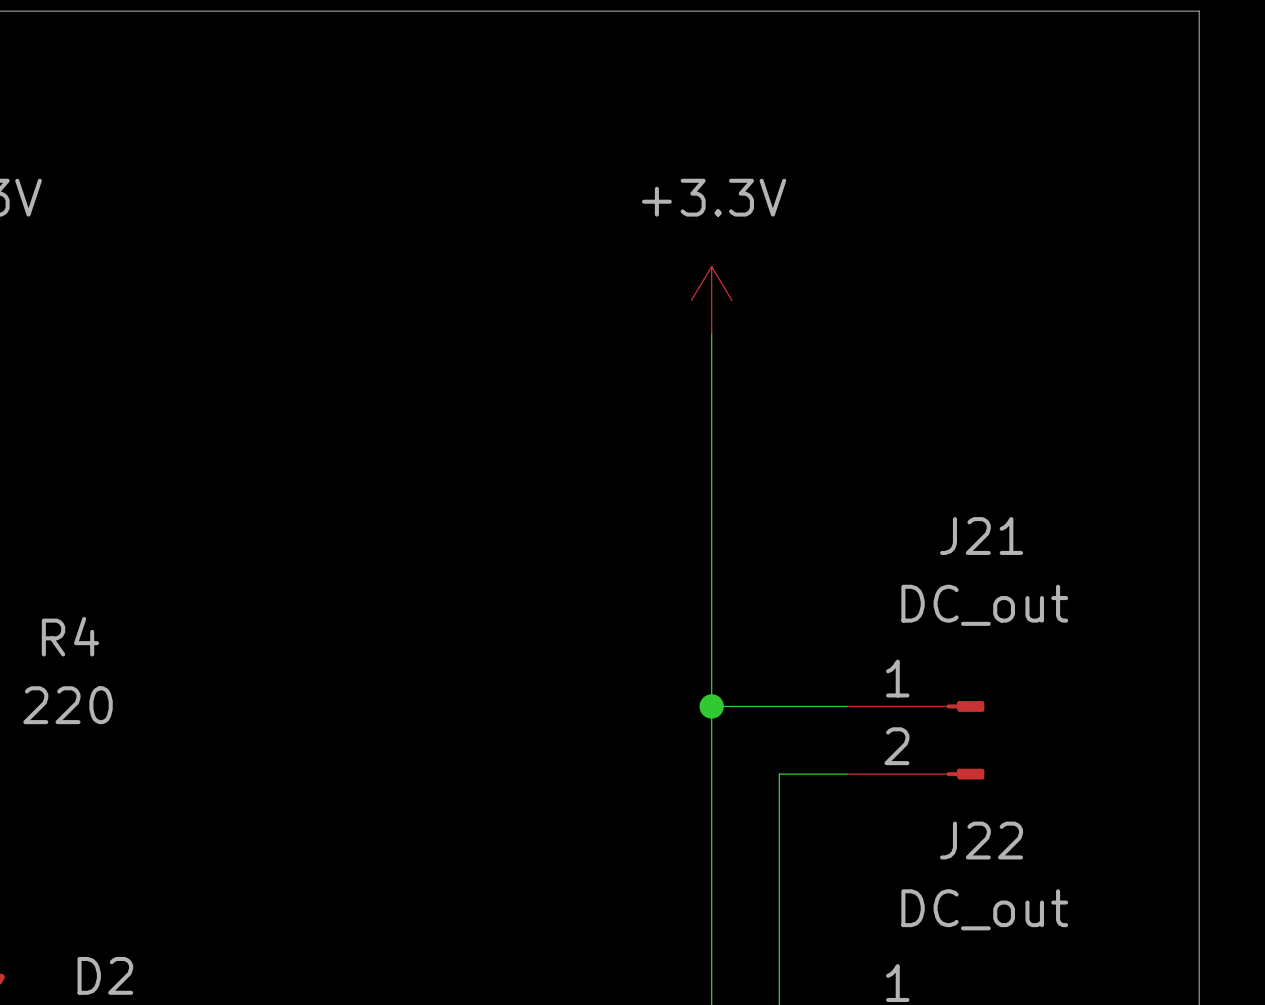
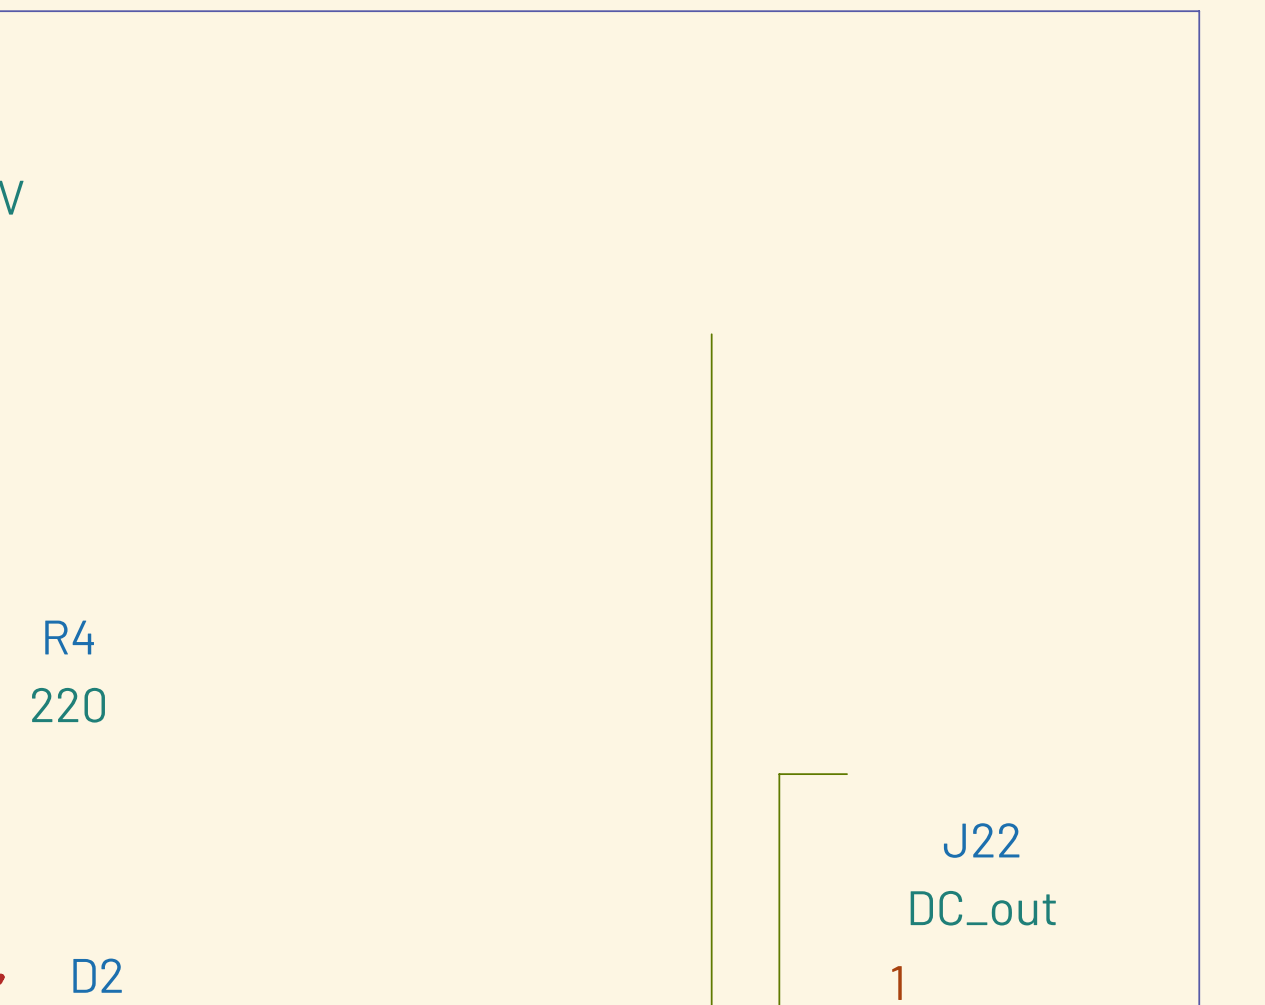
power symbol: +3.3V (711, 300) -> none
wire: (711, 706) (847, 706) -> none
junction: (711, 706) -> none
J21: DC_out (915, 740) -> none

